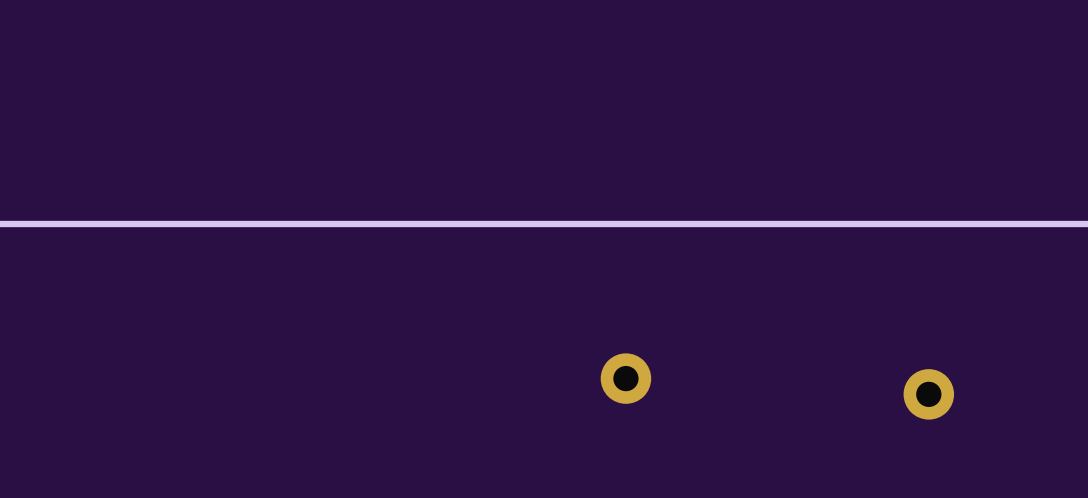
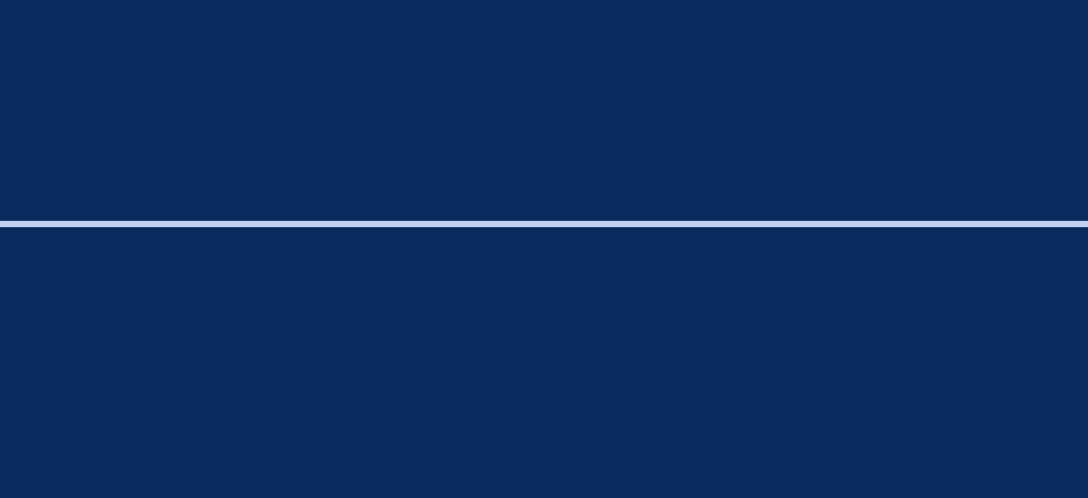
via: (625, 378) -> none
via: (928, 394) -> none

